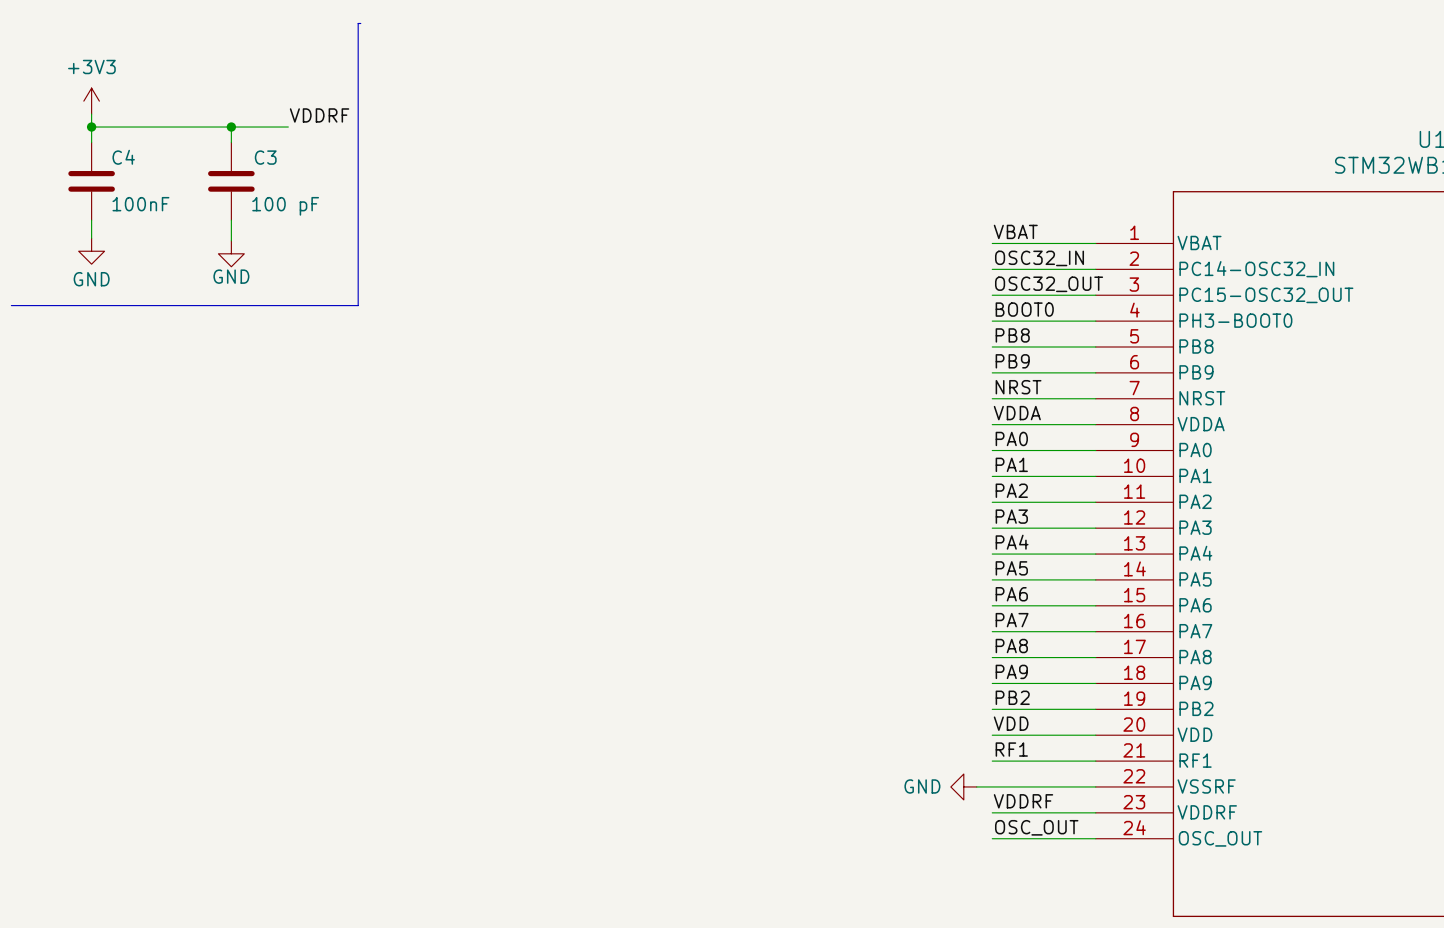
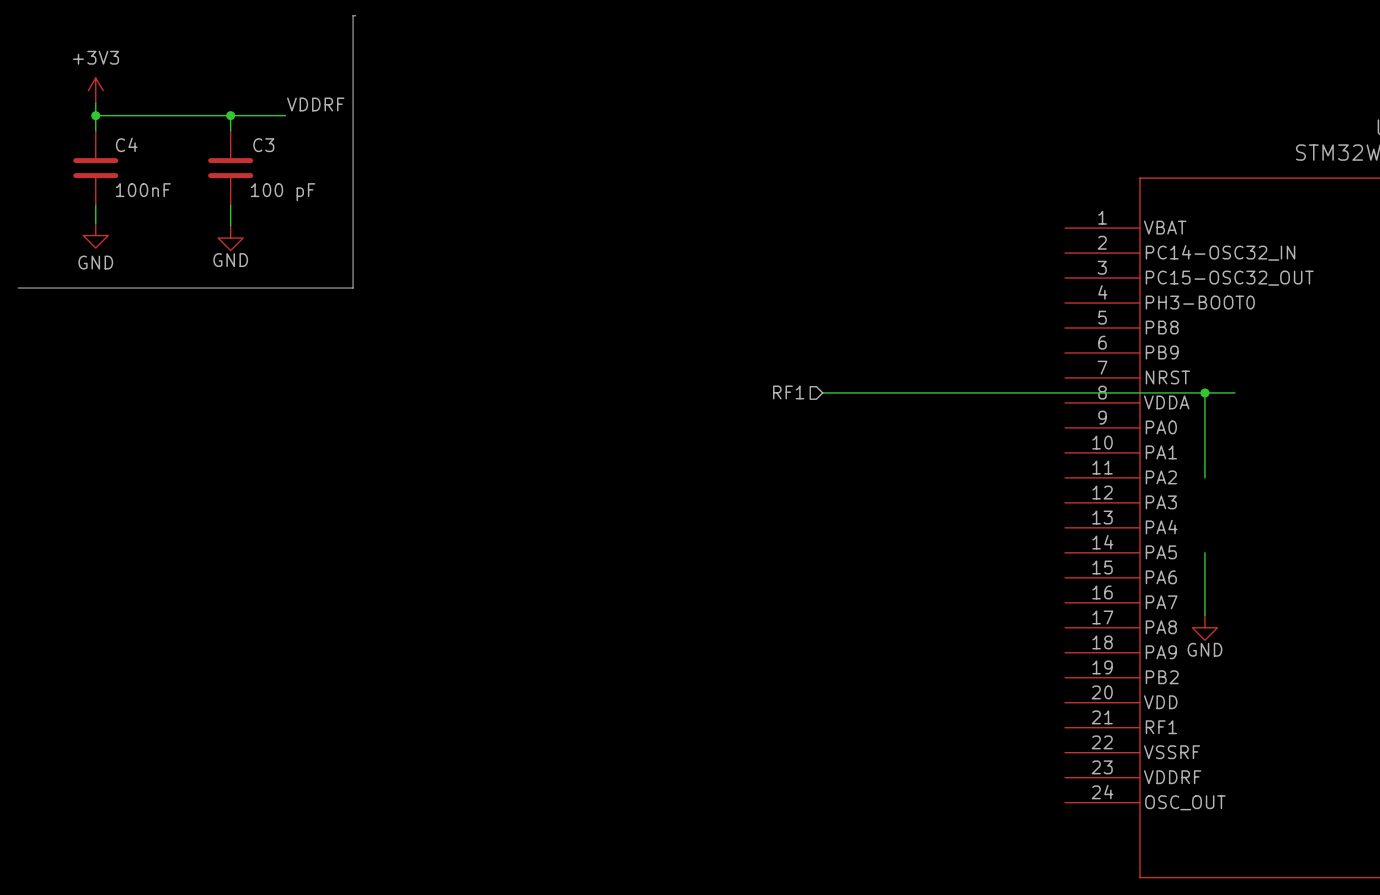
label: VBAT (1015, 231) -> none
wire: (992, 243) (1095, 243) -> none
label: OSC32_IN (1039, 258) -> none
wire: (992, 269) (1095, 269) -> none
label: OSC32_OUT (1049, 284) -> none
wire: (992, 295) (1095, 295) -> none
label: BOOT0 (1024, 309) -> none
wire: (992, 321) (1095, 321) -> none
label: PB8 (1012, 335) -> none
wire: (992, 347) (1095, 347) -> none
label: PB9 (1012, 361) -> none
wire: (992, 372) (1095, 372) -> none
label: NRST (1018, 387) -> none
wire: (992, 398) (1095, 398) -> none
hierarchical label: none -> RF1 (788, 392)
label: VDDA (1017, 413) -> none
wire: none -> (822, 392) (1234, 392)
wire: none -> (1204, 392) (1204, 477)
junction: none -> (1204, 392)
wire: (992, 424) (1095, 424) -> none
label: PA0 (1011, 438) -> none
wire: (992, 450) (1095, 450) -> none
label: PA1 (1011, 464) -> none
wire: (992, 476) (1095, 476) -> none
label: PA2 (1011, 490) -> none
wire: (992, 502) (1095, 502) -> none
label: PA3 (1011, 516) -> none
wire: (992, 528) (1095, 528) -> none
label: PA4 (1012, 542) -> none
wire: (992, 554) (1095, 554) -> none
label: PA5 (1011, 568) -> none
wire: (992, 579) (1095, 579) -> none
wire: none -> (1204, 552) (1204, 615)
label: PA6 (1011, 594) -> none
wire: (992, 605) (1095, 605) -> none
label: PA7 (1012, 620) -> none
wire: (992, 631) (1095, 631) -> none
label: PA8 (1011, 646) -> none
wire: (992, 657) (1095, 657) -> none
power symbol: none -> GND (1204, 627)
label: PA9 (1011, 671) -> none
wire: (992, 683) (1095, 683) -> none
label: PB2 (1012, 697) -> none
wire: (992, 709) (1095, 709) -> none
label: VDD (1011, 723) -> none
wire: (992, 735) (1095, 735) -> none
label: RF1 (1011, 749) -> none
wire: (992, 761) (1095, 761) -> none
power symbol: GND (963, 786) -> none
wire: (976, 786) (1095, 786) -> none
label: VDDRF (1023, 801) -> none
wire: (992, 812) (1095, 812) -> none
label: OSC_OUT (1036, 827) -> none
wire: (992, 838) (1095, 838) -> none

